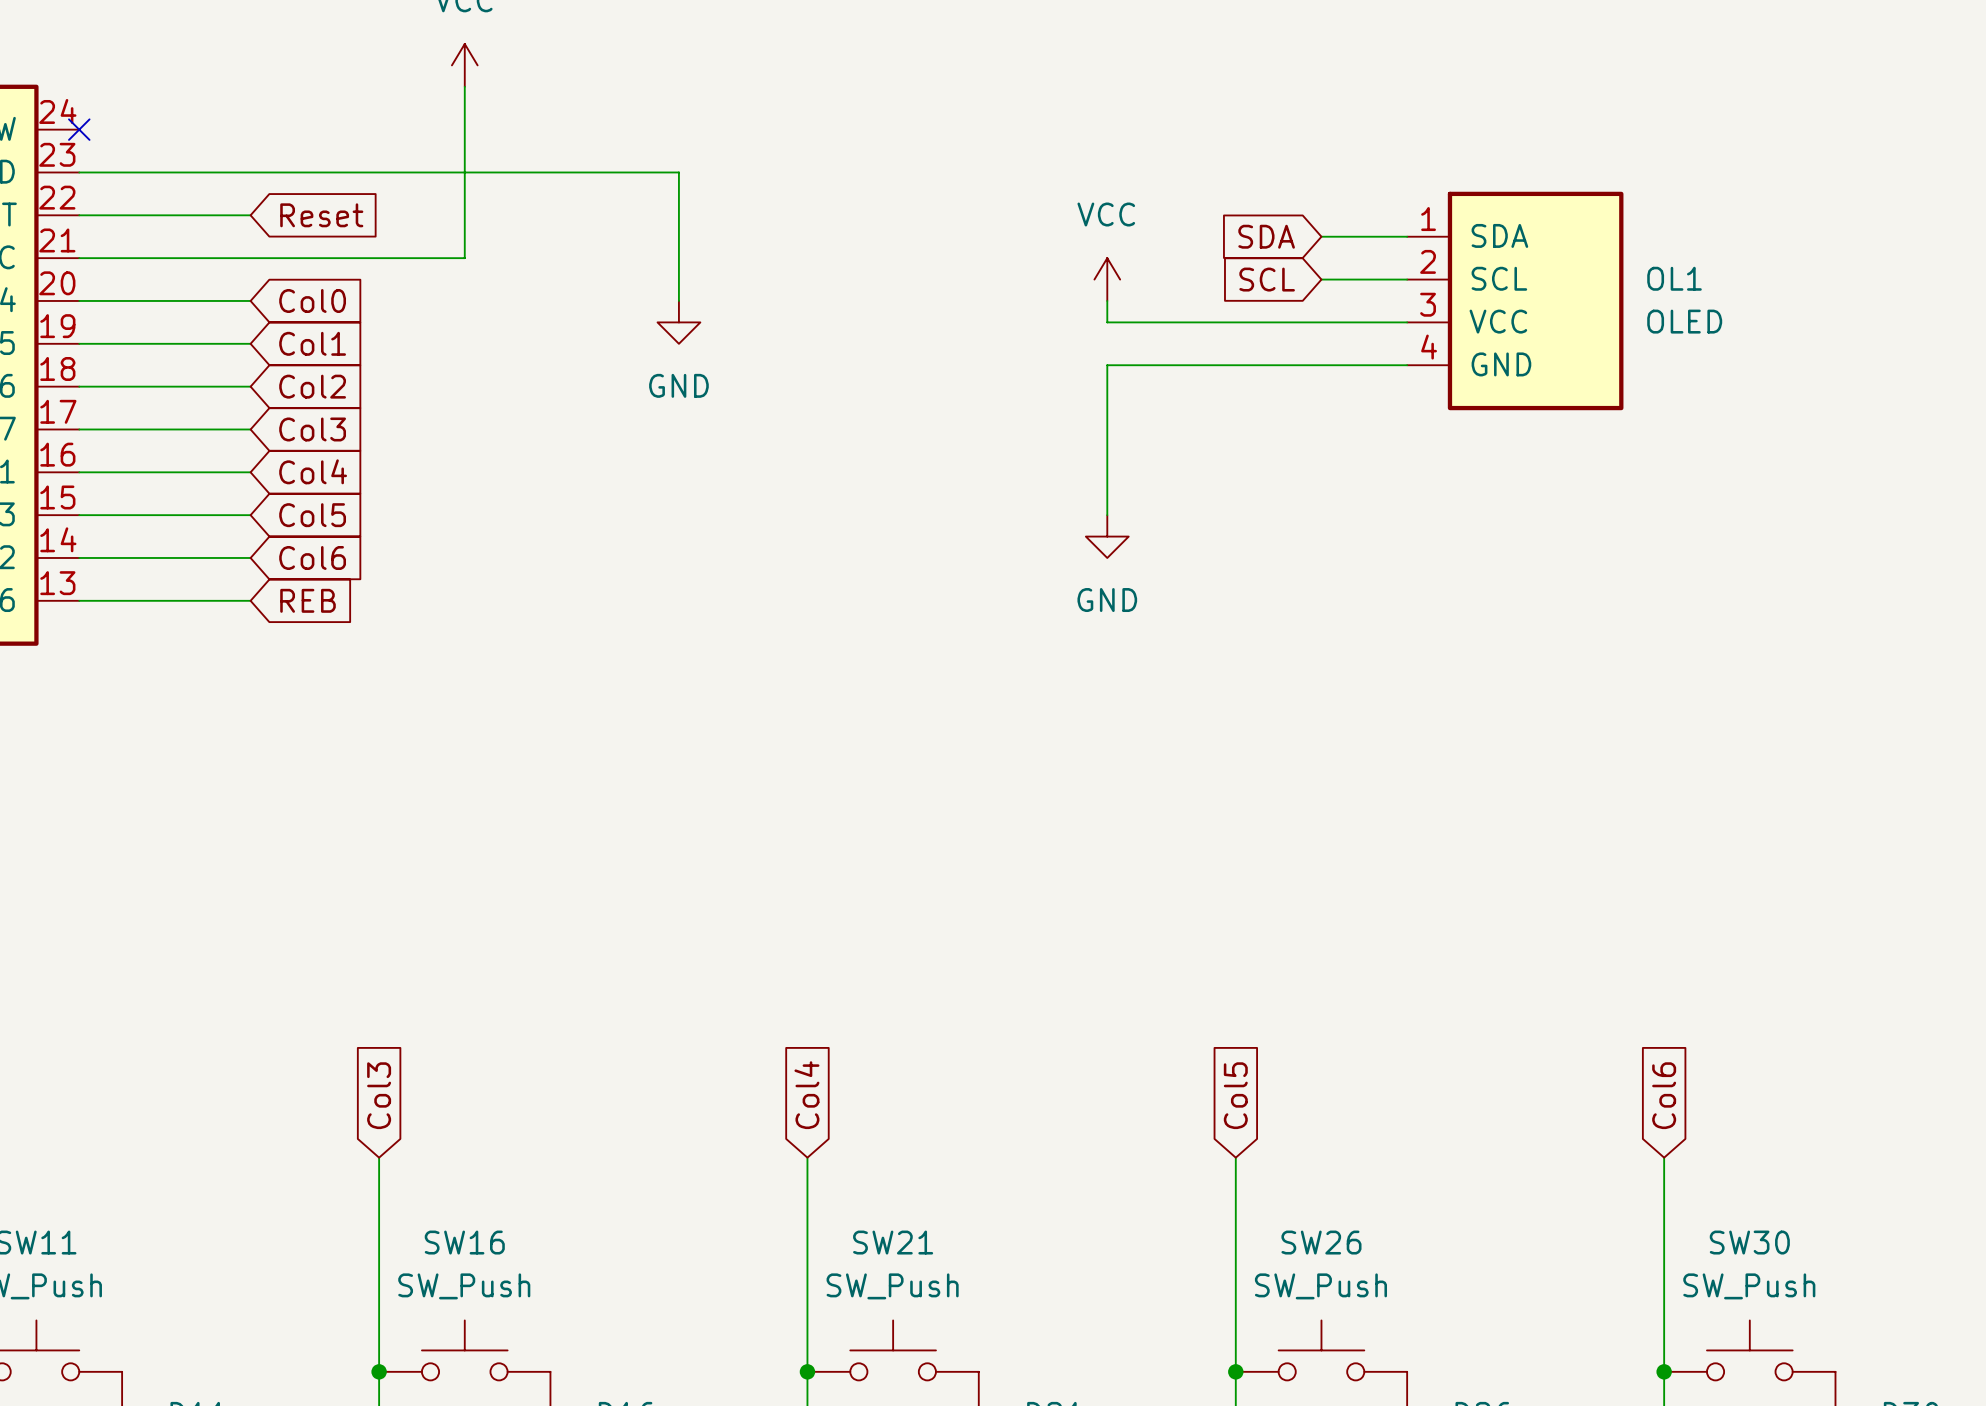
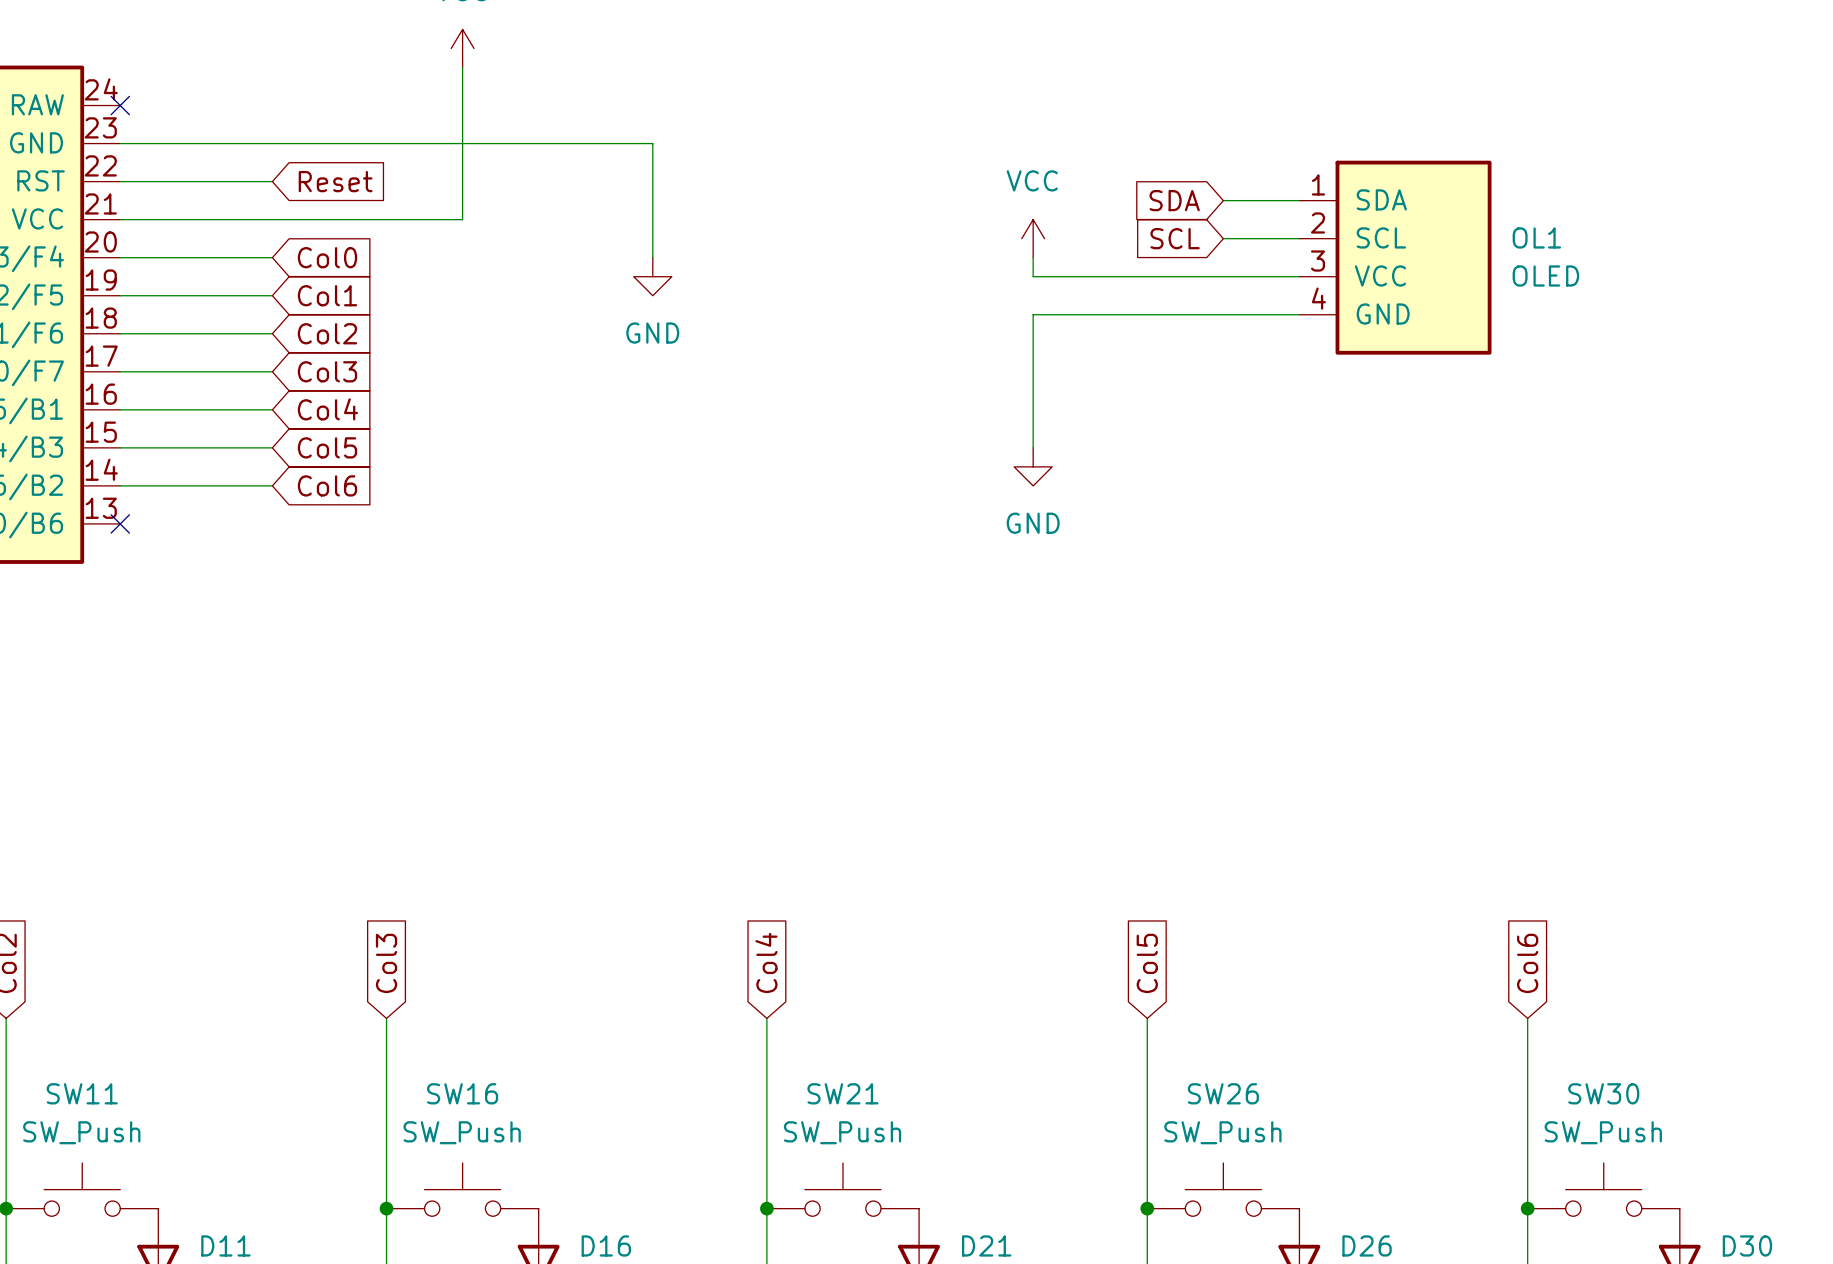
wire: (79, 600) (250, 600) -> none
no-connect mark: none -> (120, 523)
global label: REB (308, 600) -> none

